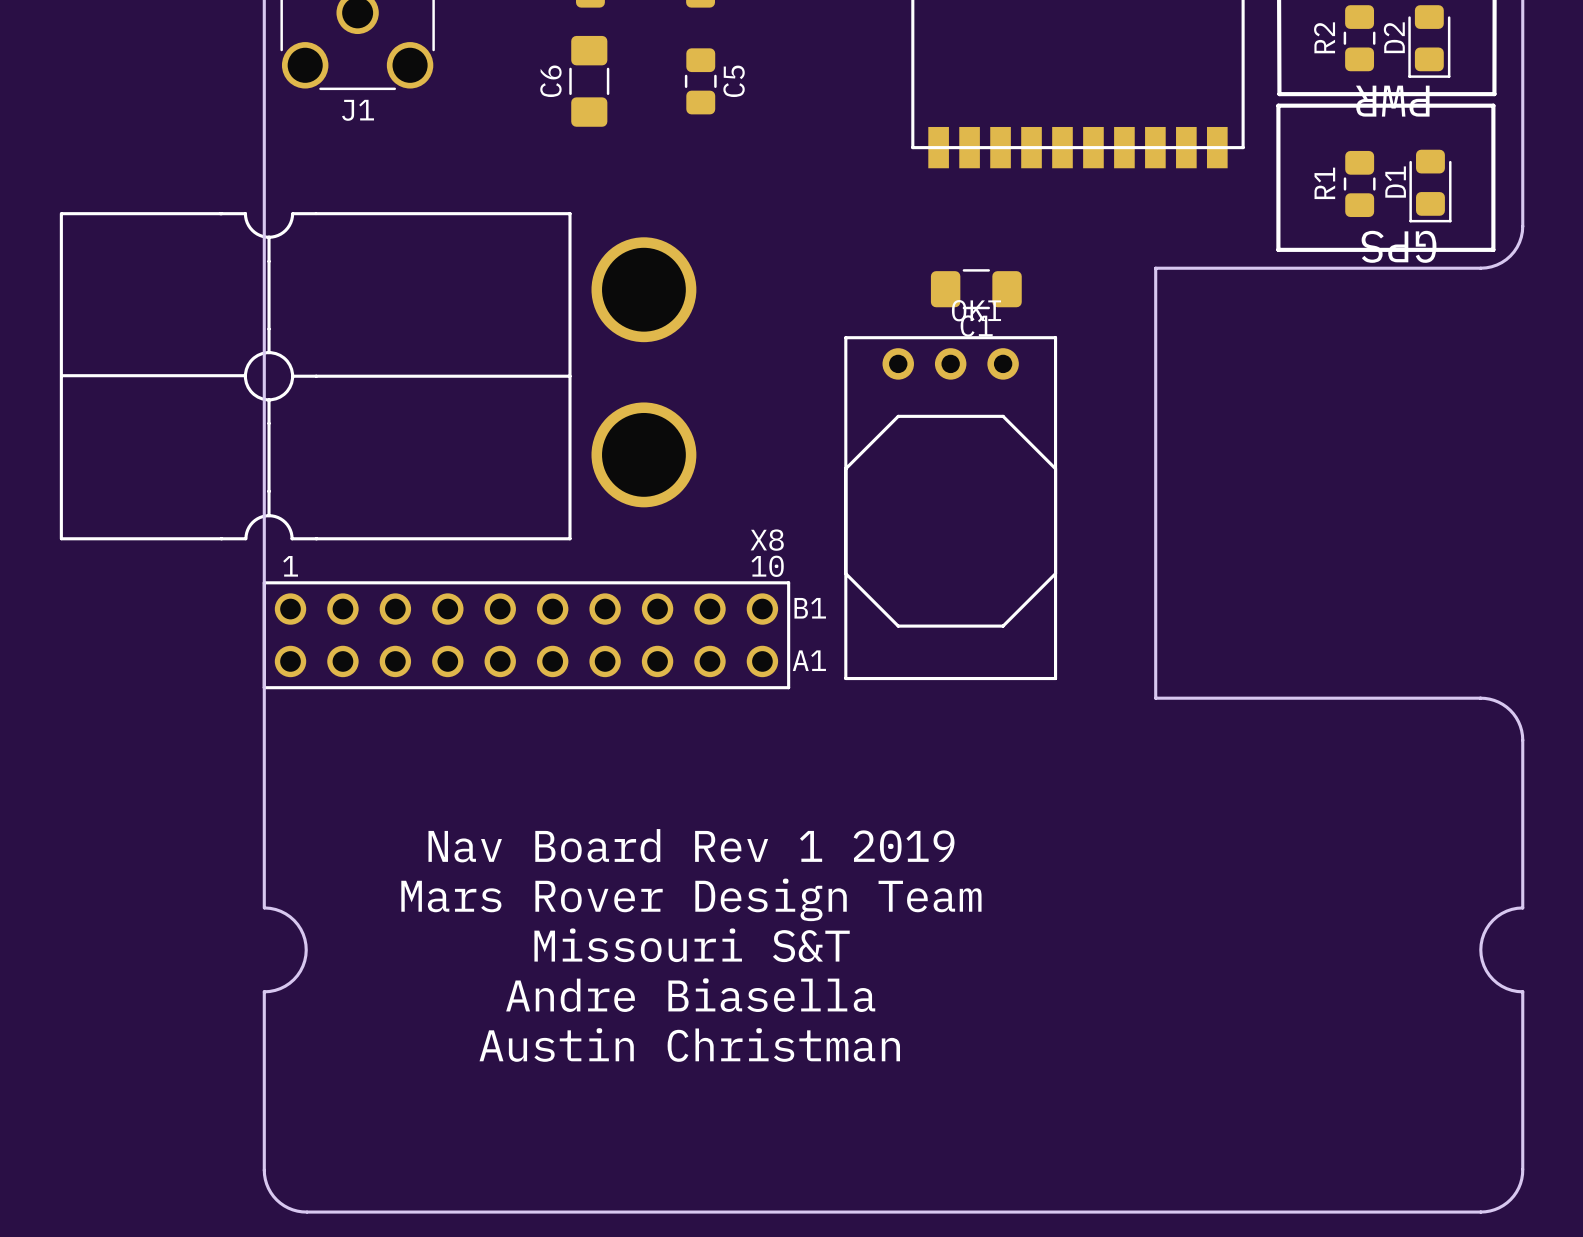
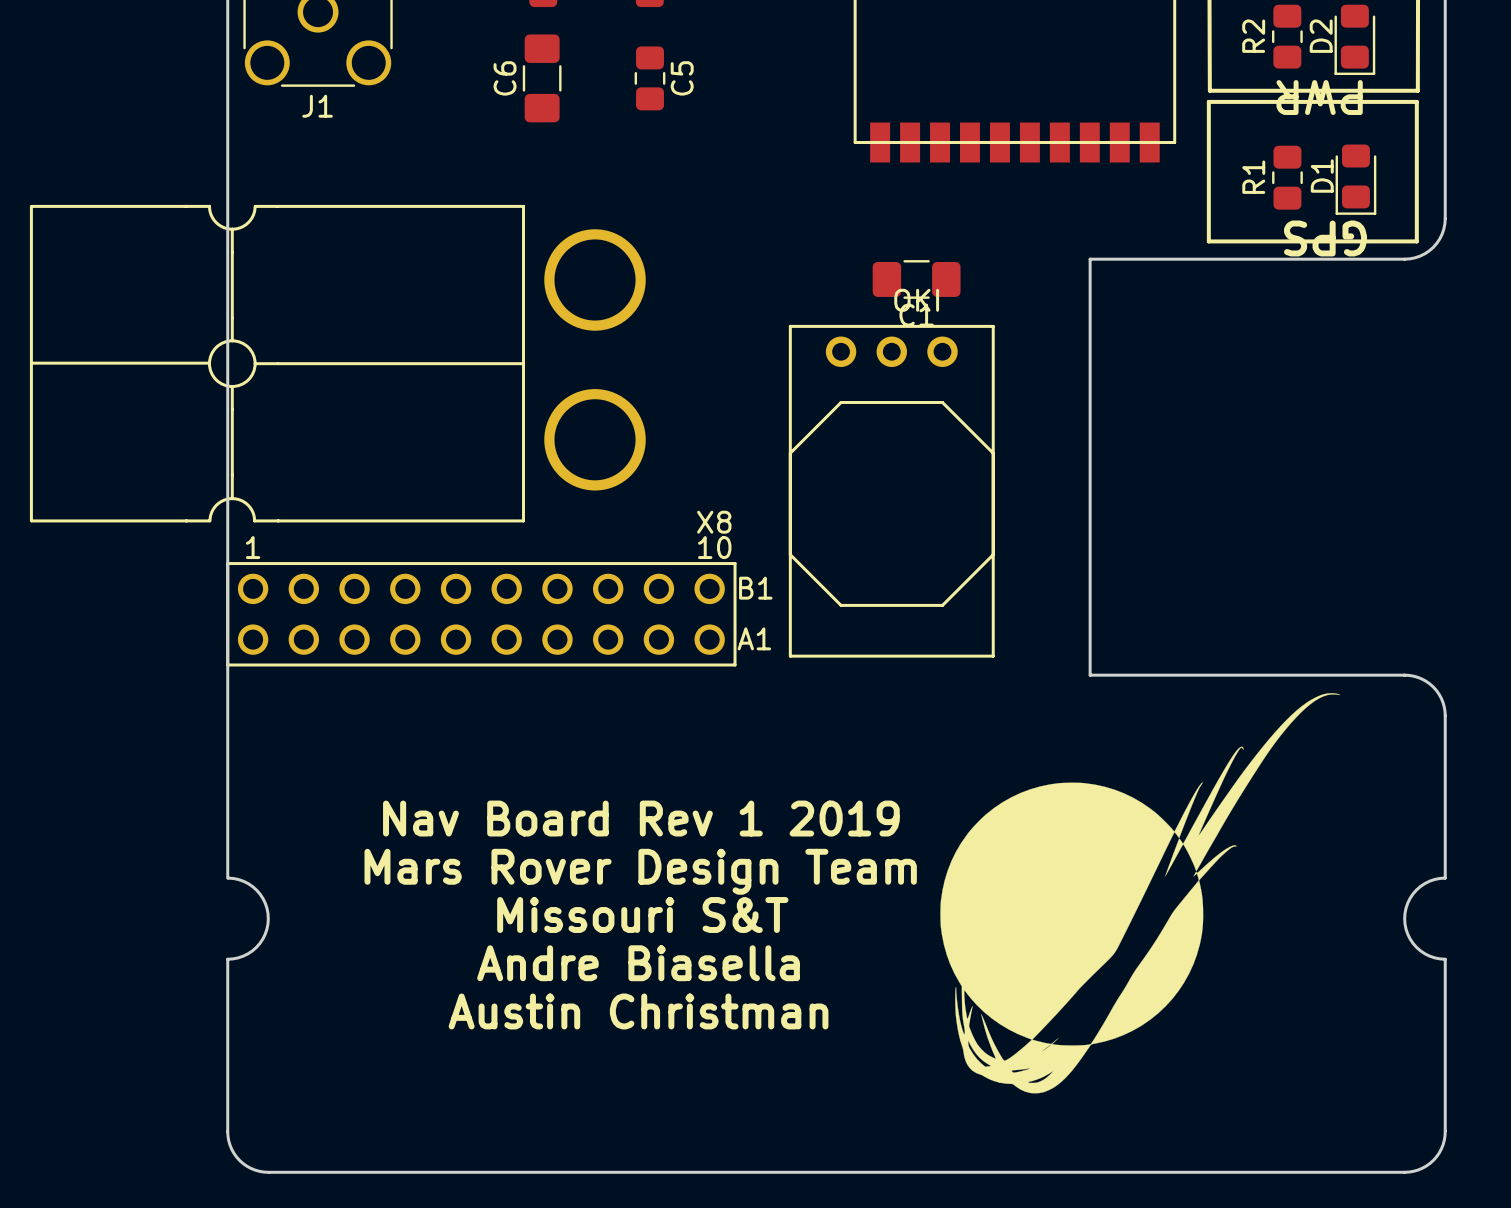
drawing: none -> [940, 693, 1341, 1094]

